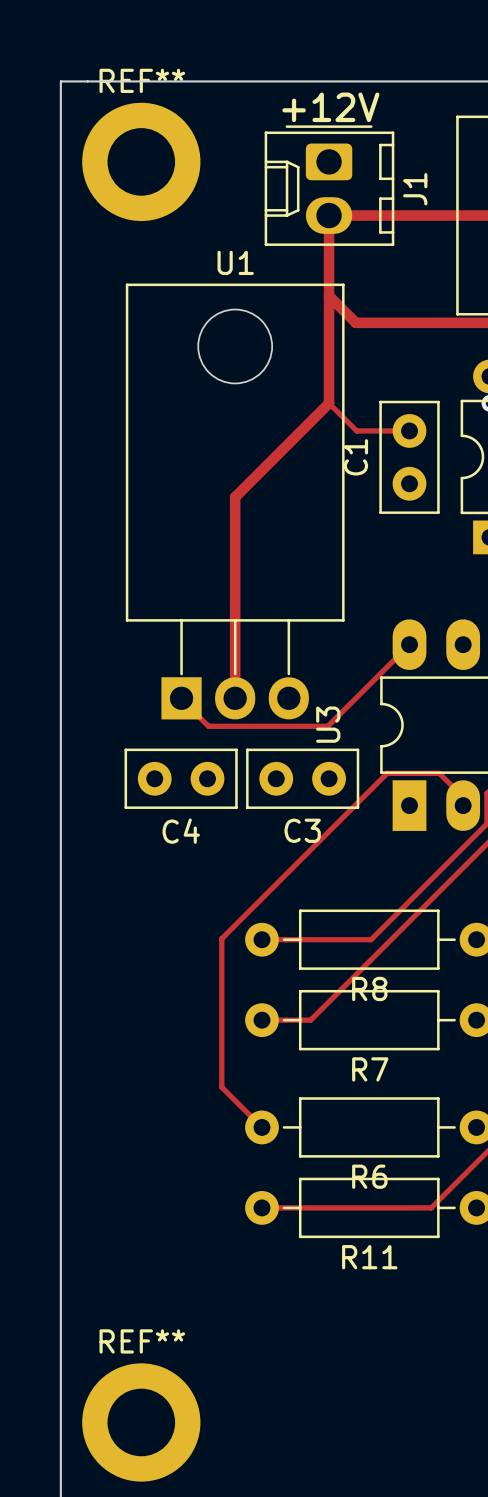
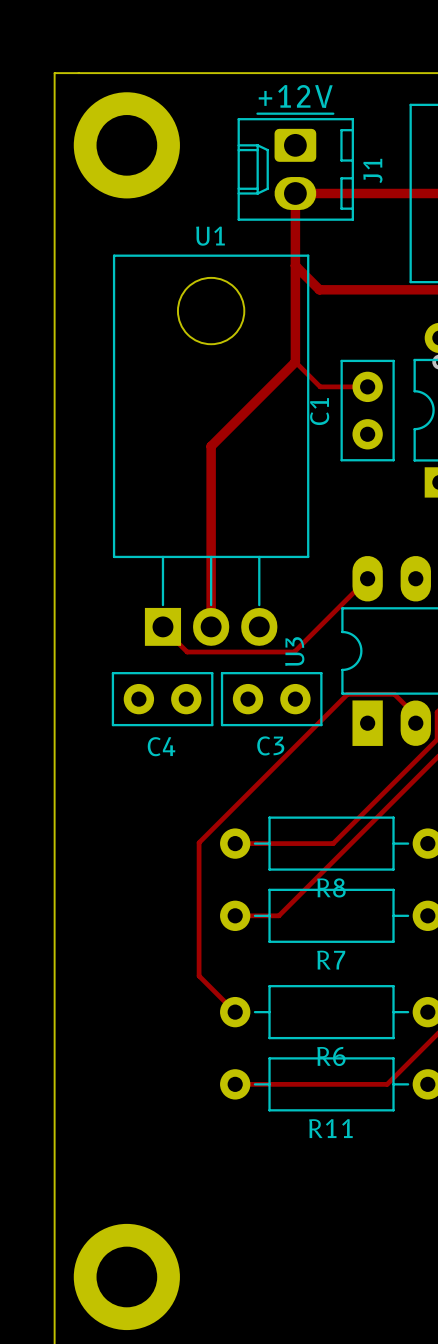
REF** name: REF** (142, 80) -> none
REF** name: REF** (142, 1341) -> none

